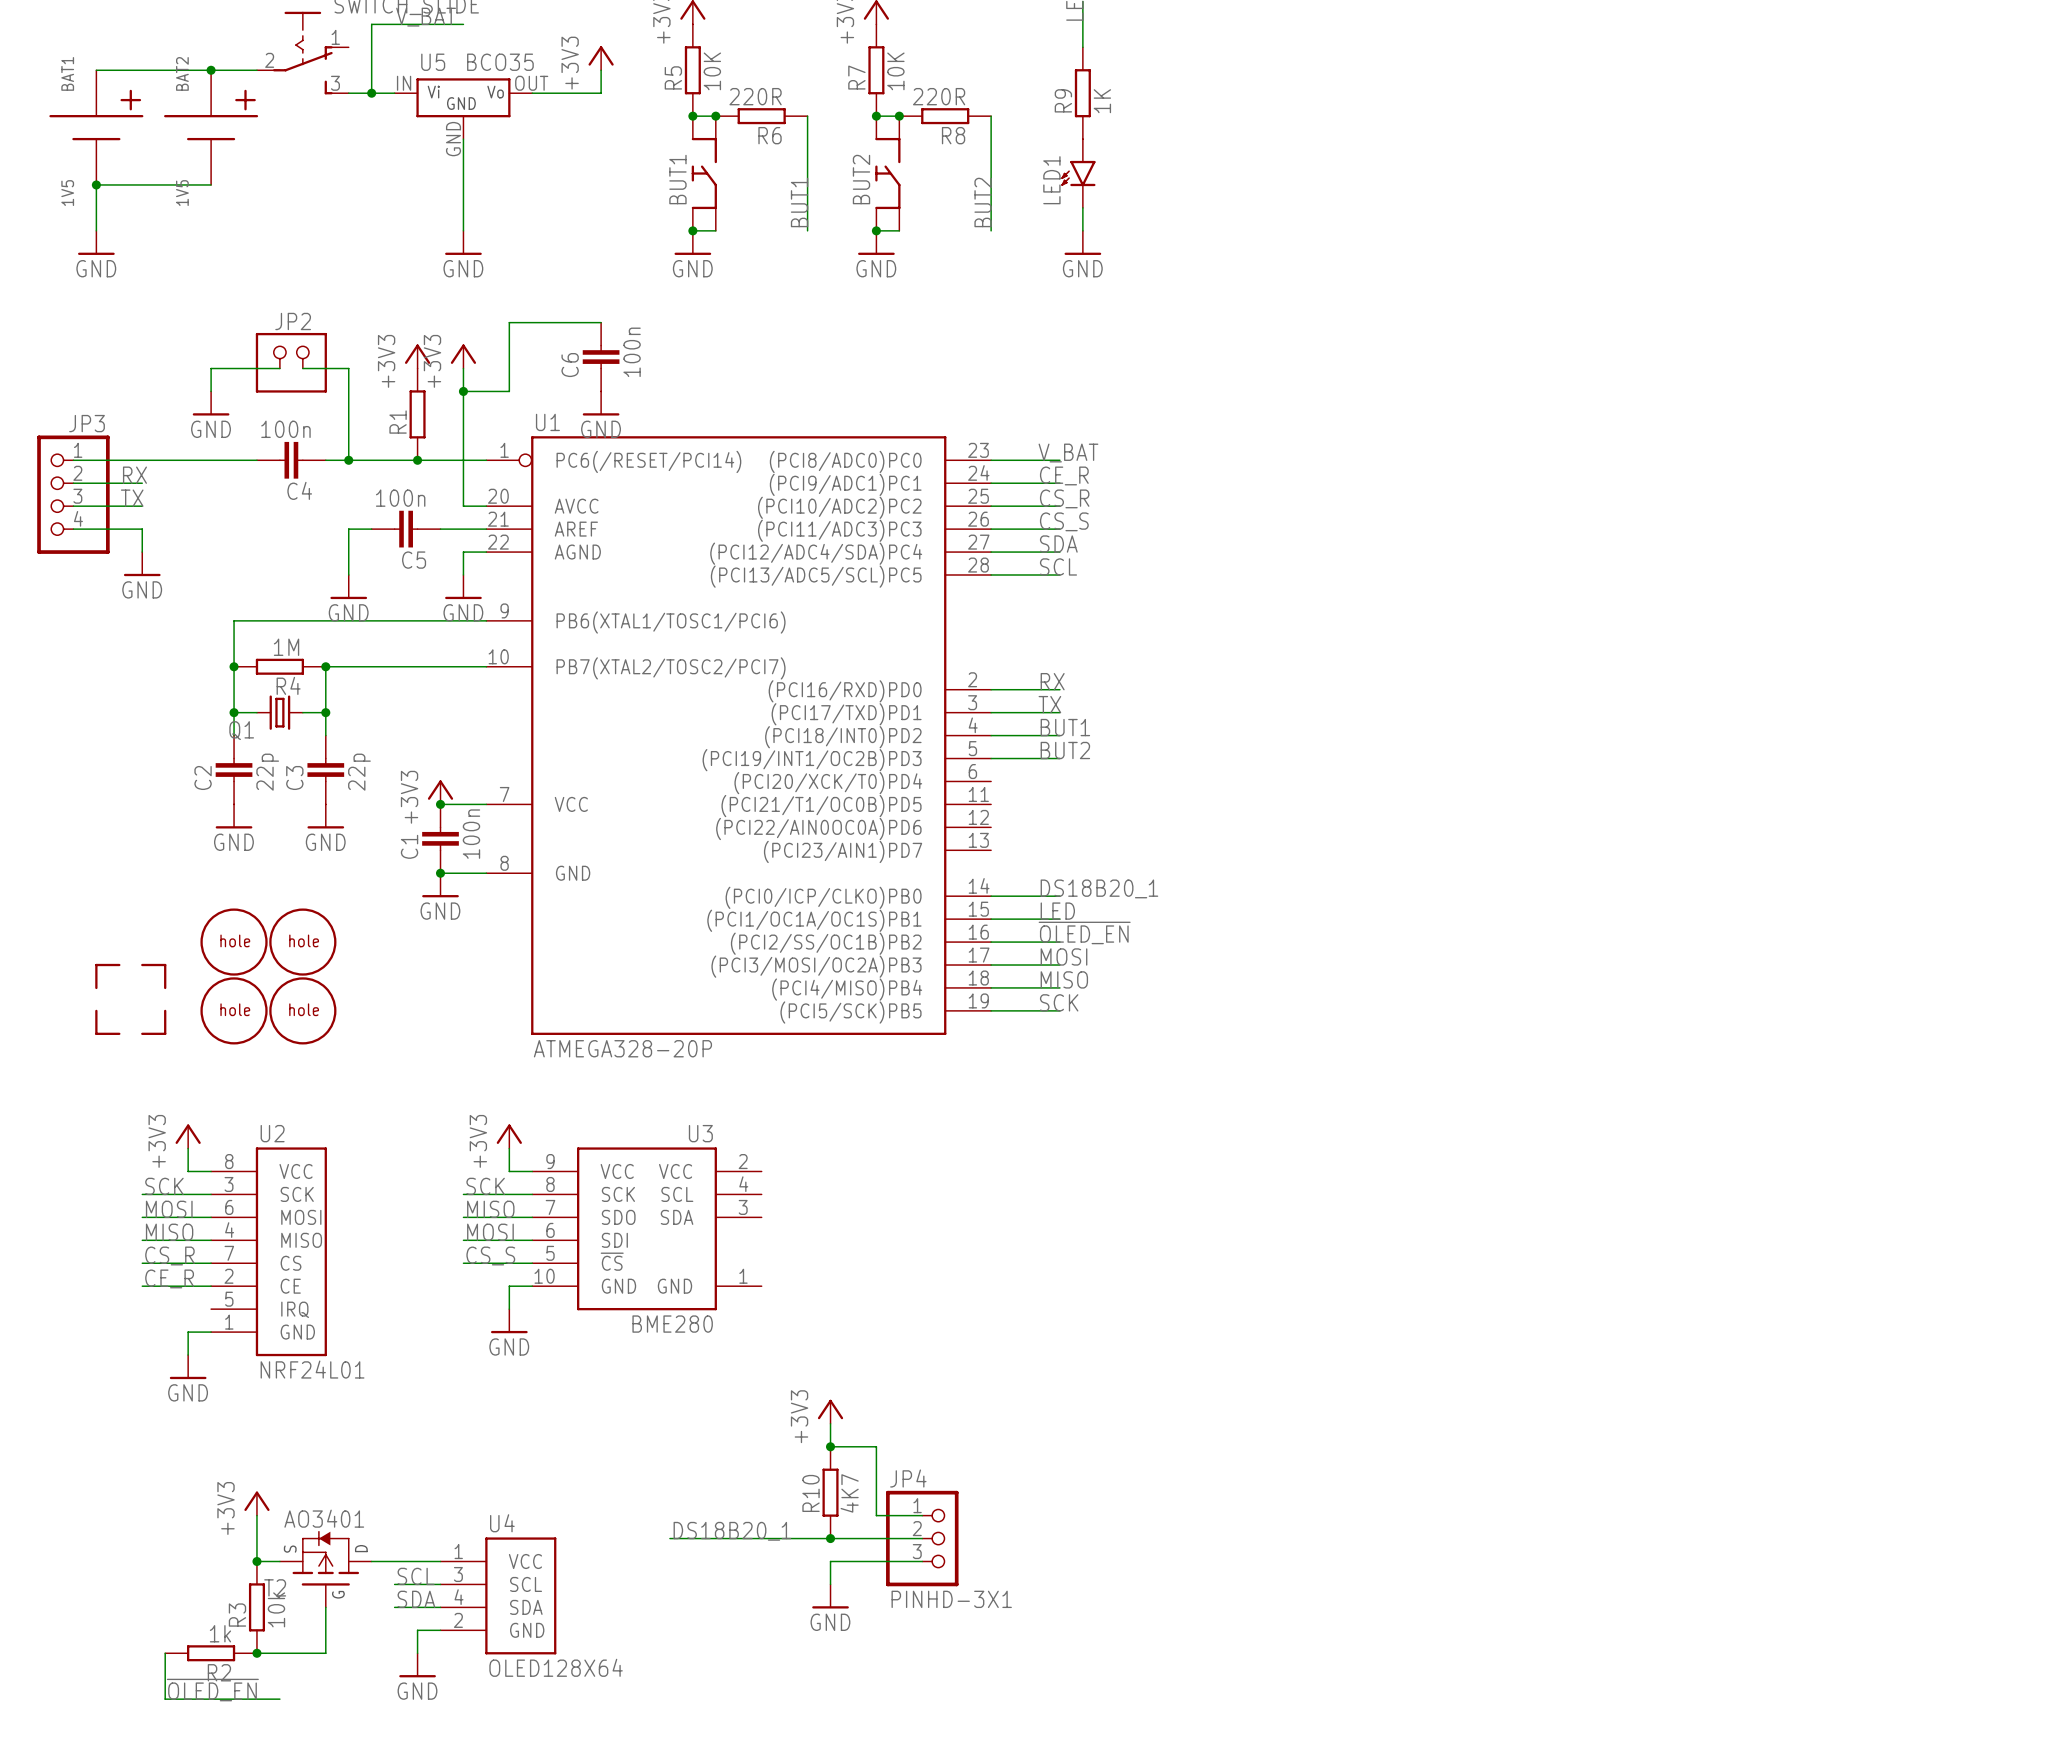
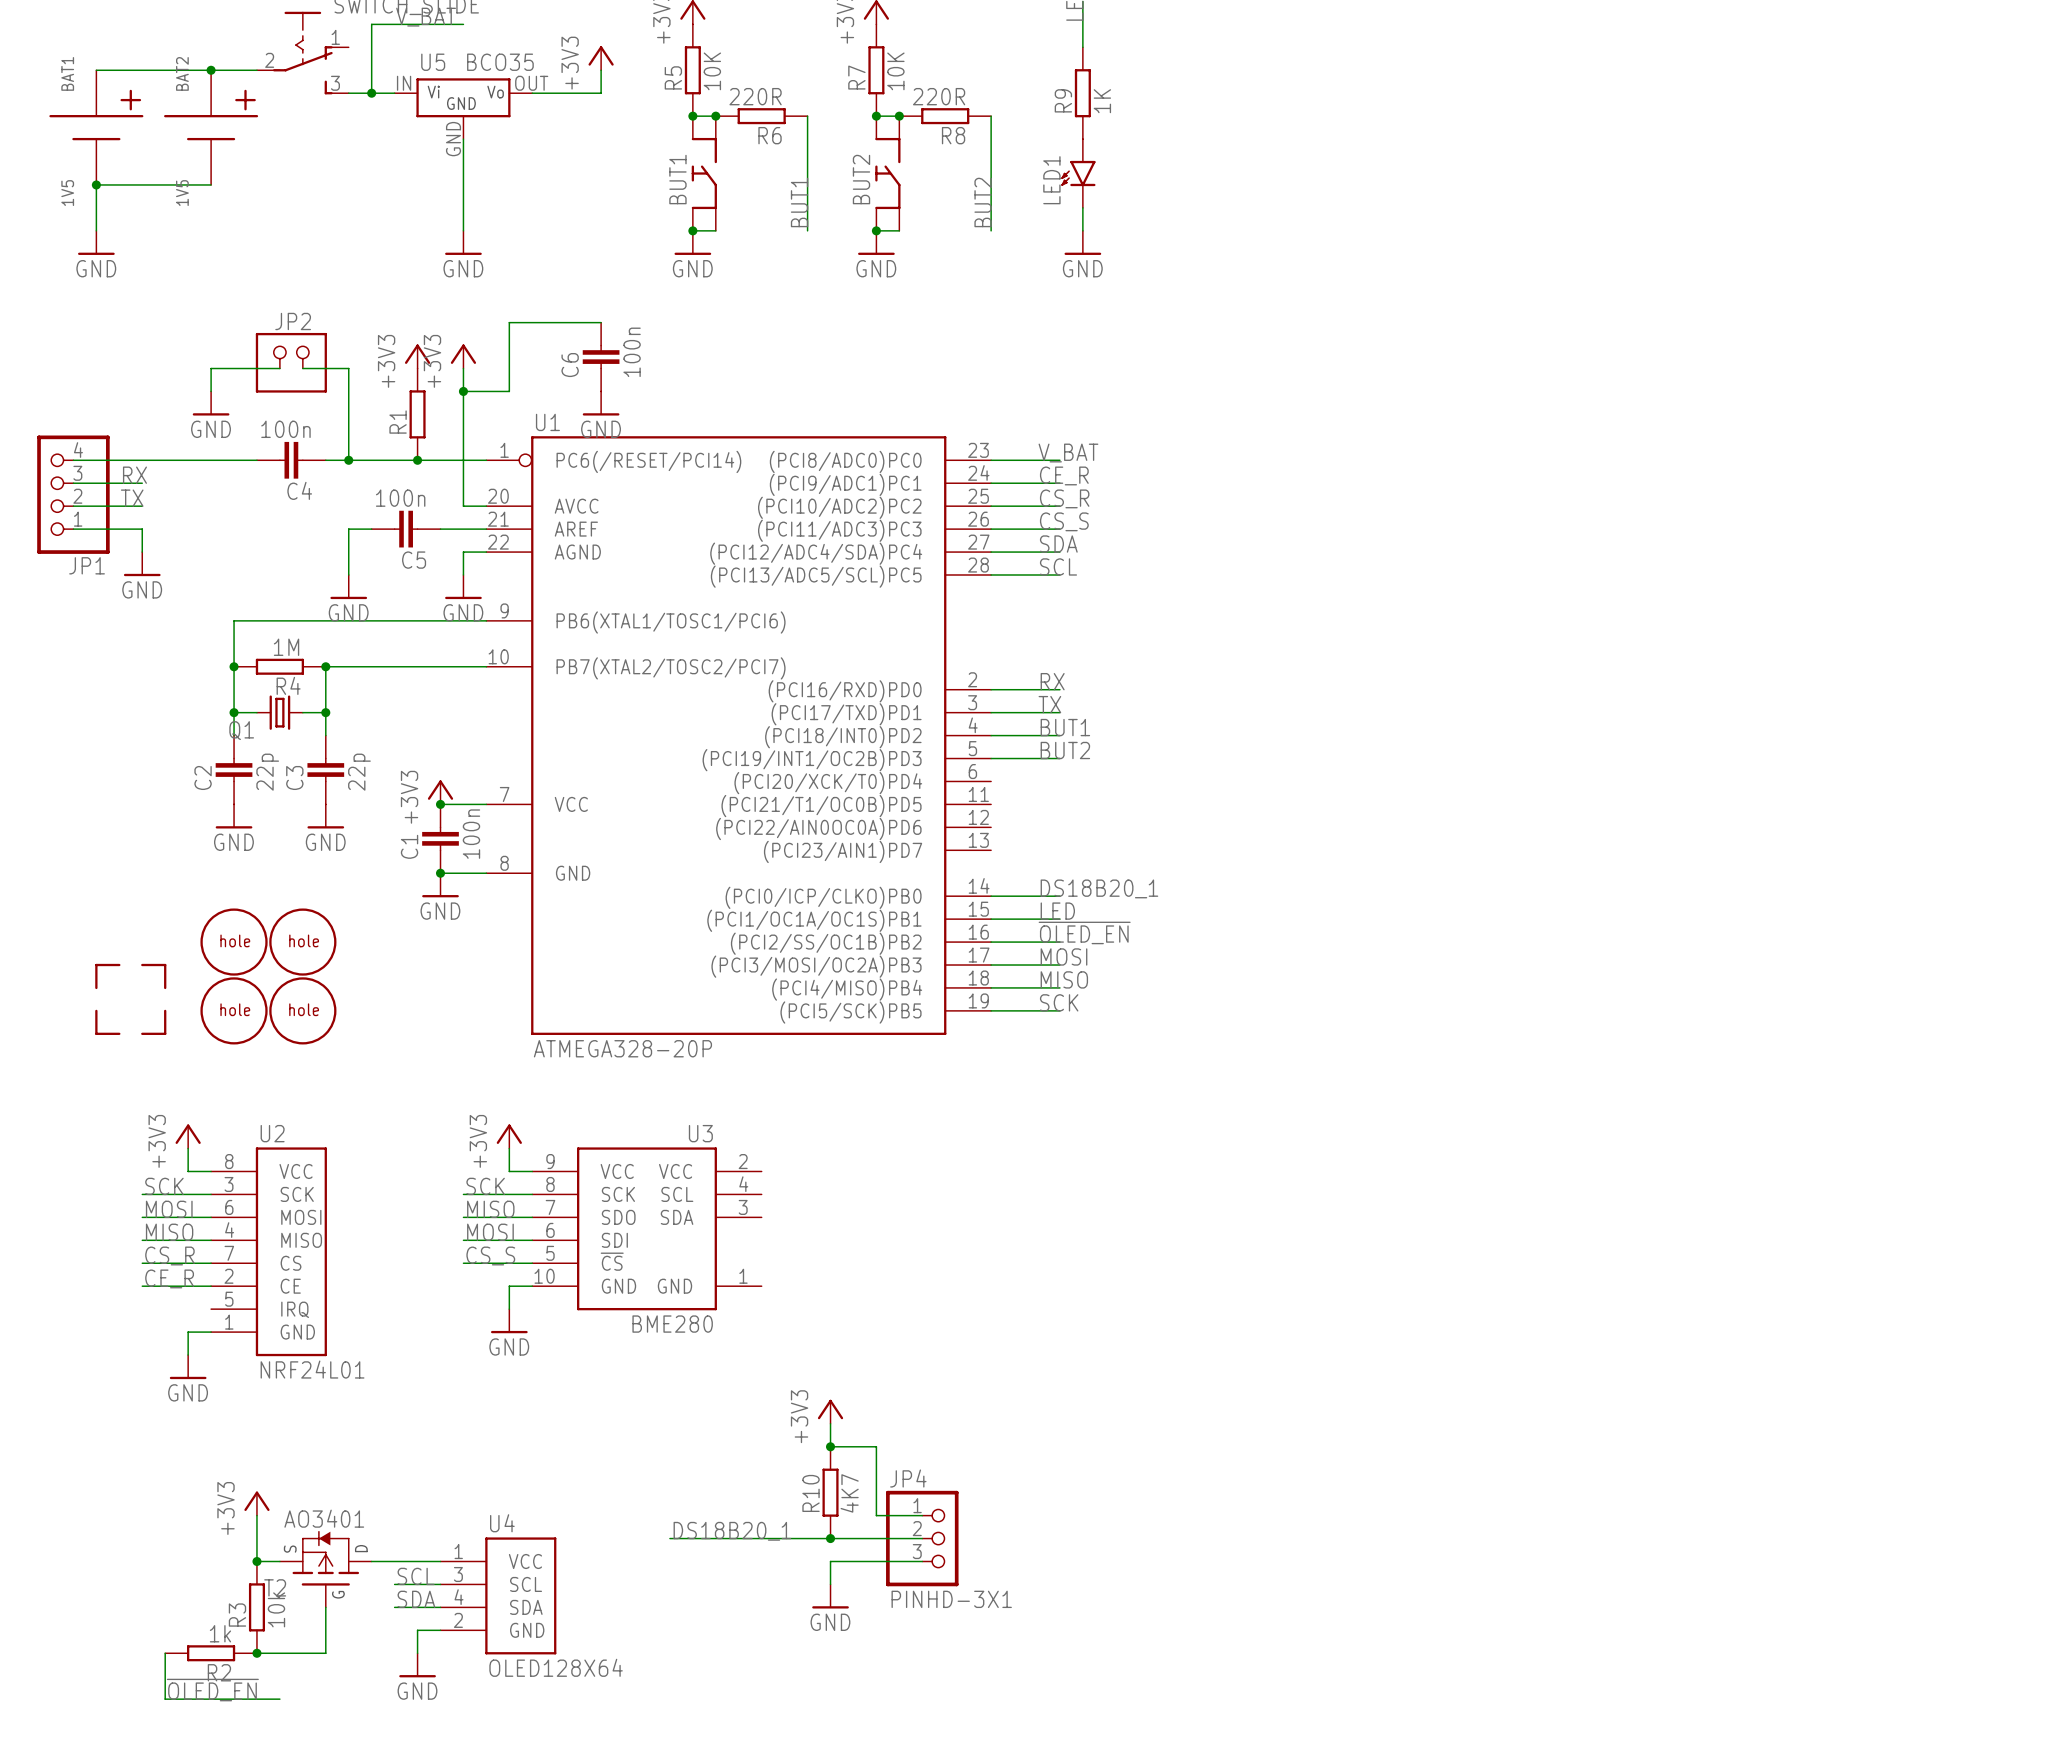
JP3 name: JP3 (87, 423) -> JP1 (87, 565)
JP3 flip: as is (73, 494) -> up-down (73, 494)

